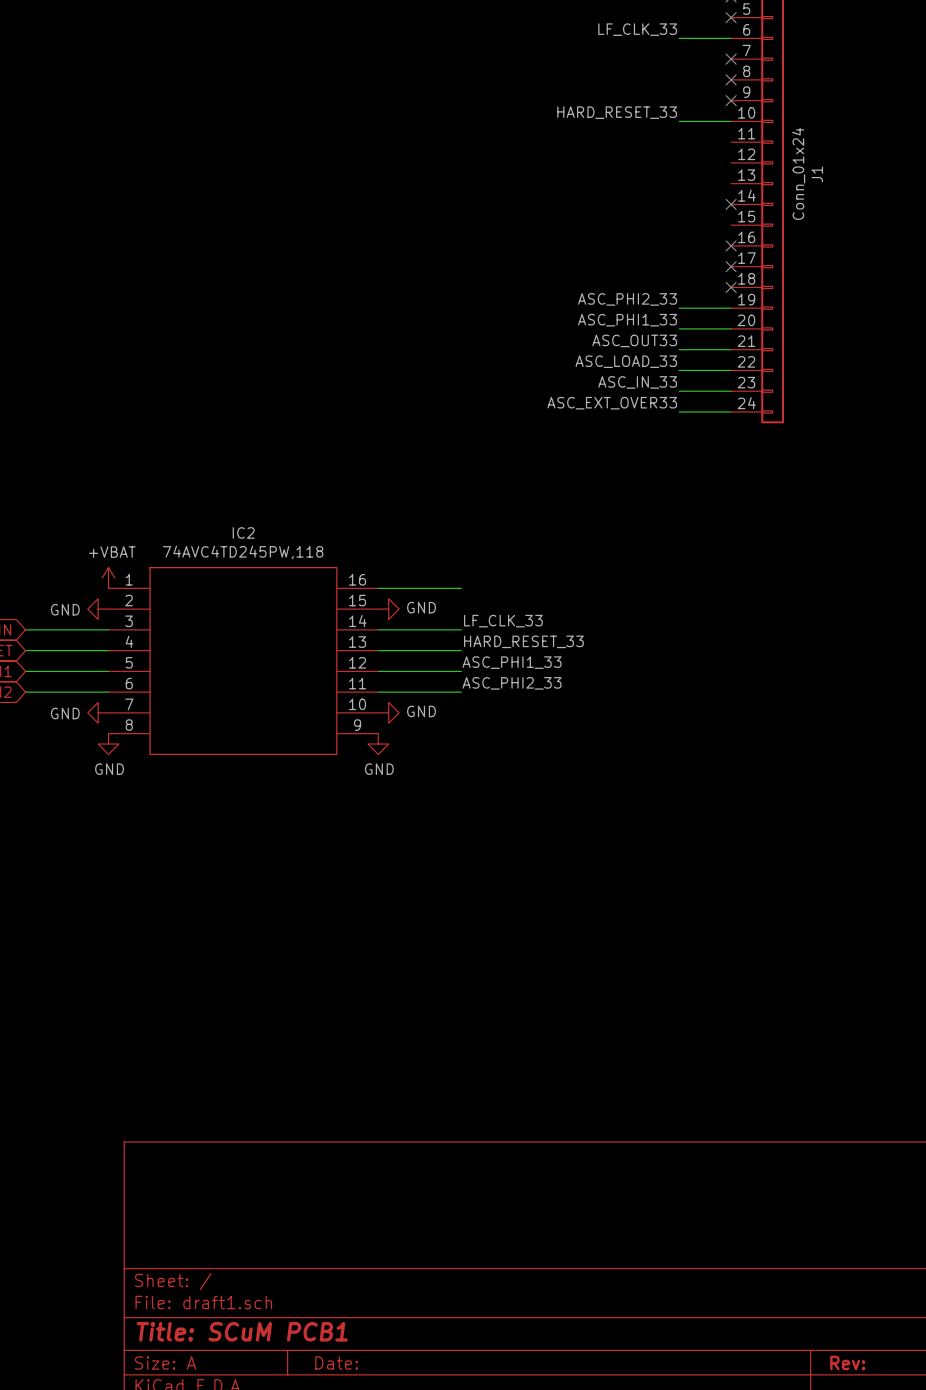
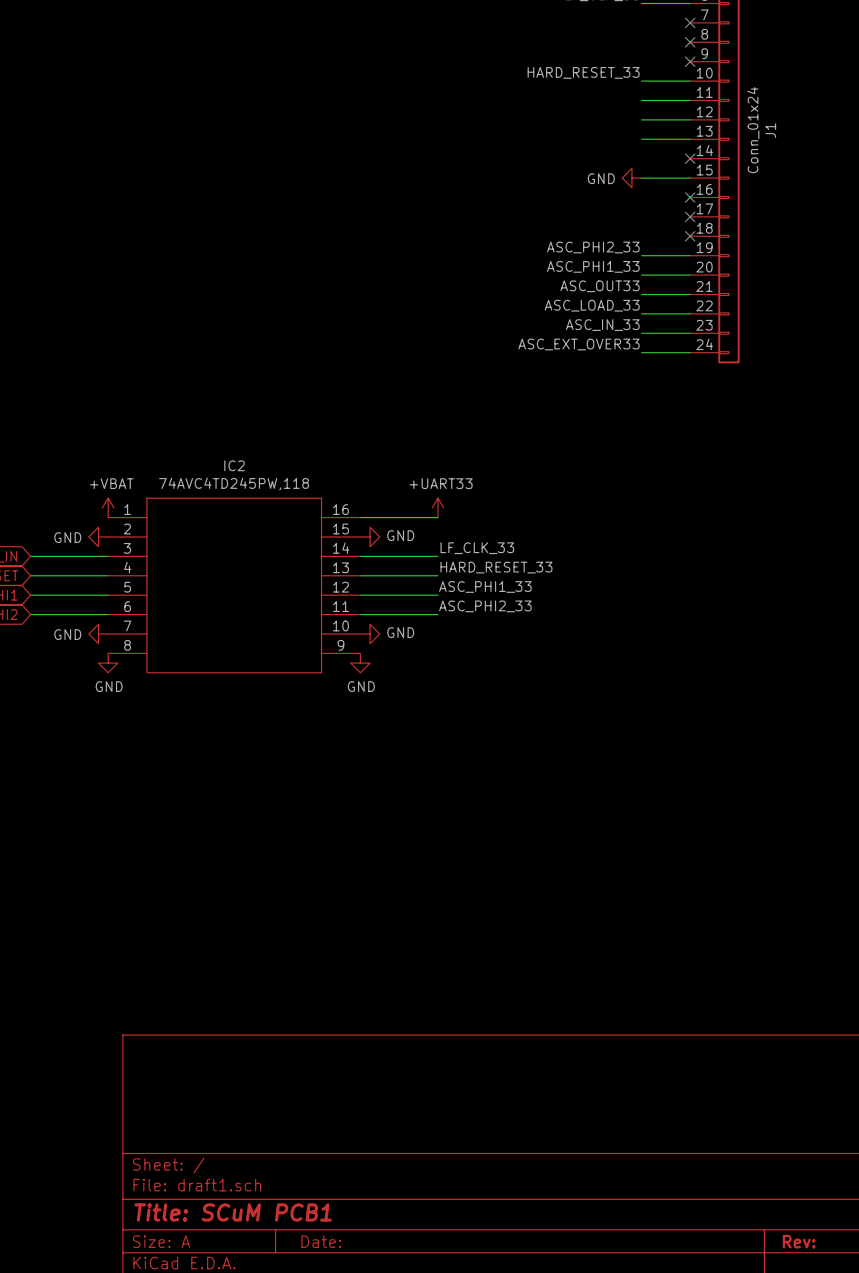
wire: none -> (641, 100) (690, 100)
wire: none -> (641, 119) (690, 119)
wire: none -> (641, 139) (690, 139)
power symbol: none -> GND (631, 178)
wire: none -> (641, 178) (690, 178)
power symbol: none -> +UART33 (437, 507)

